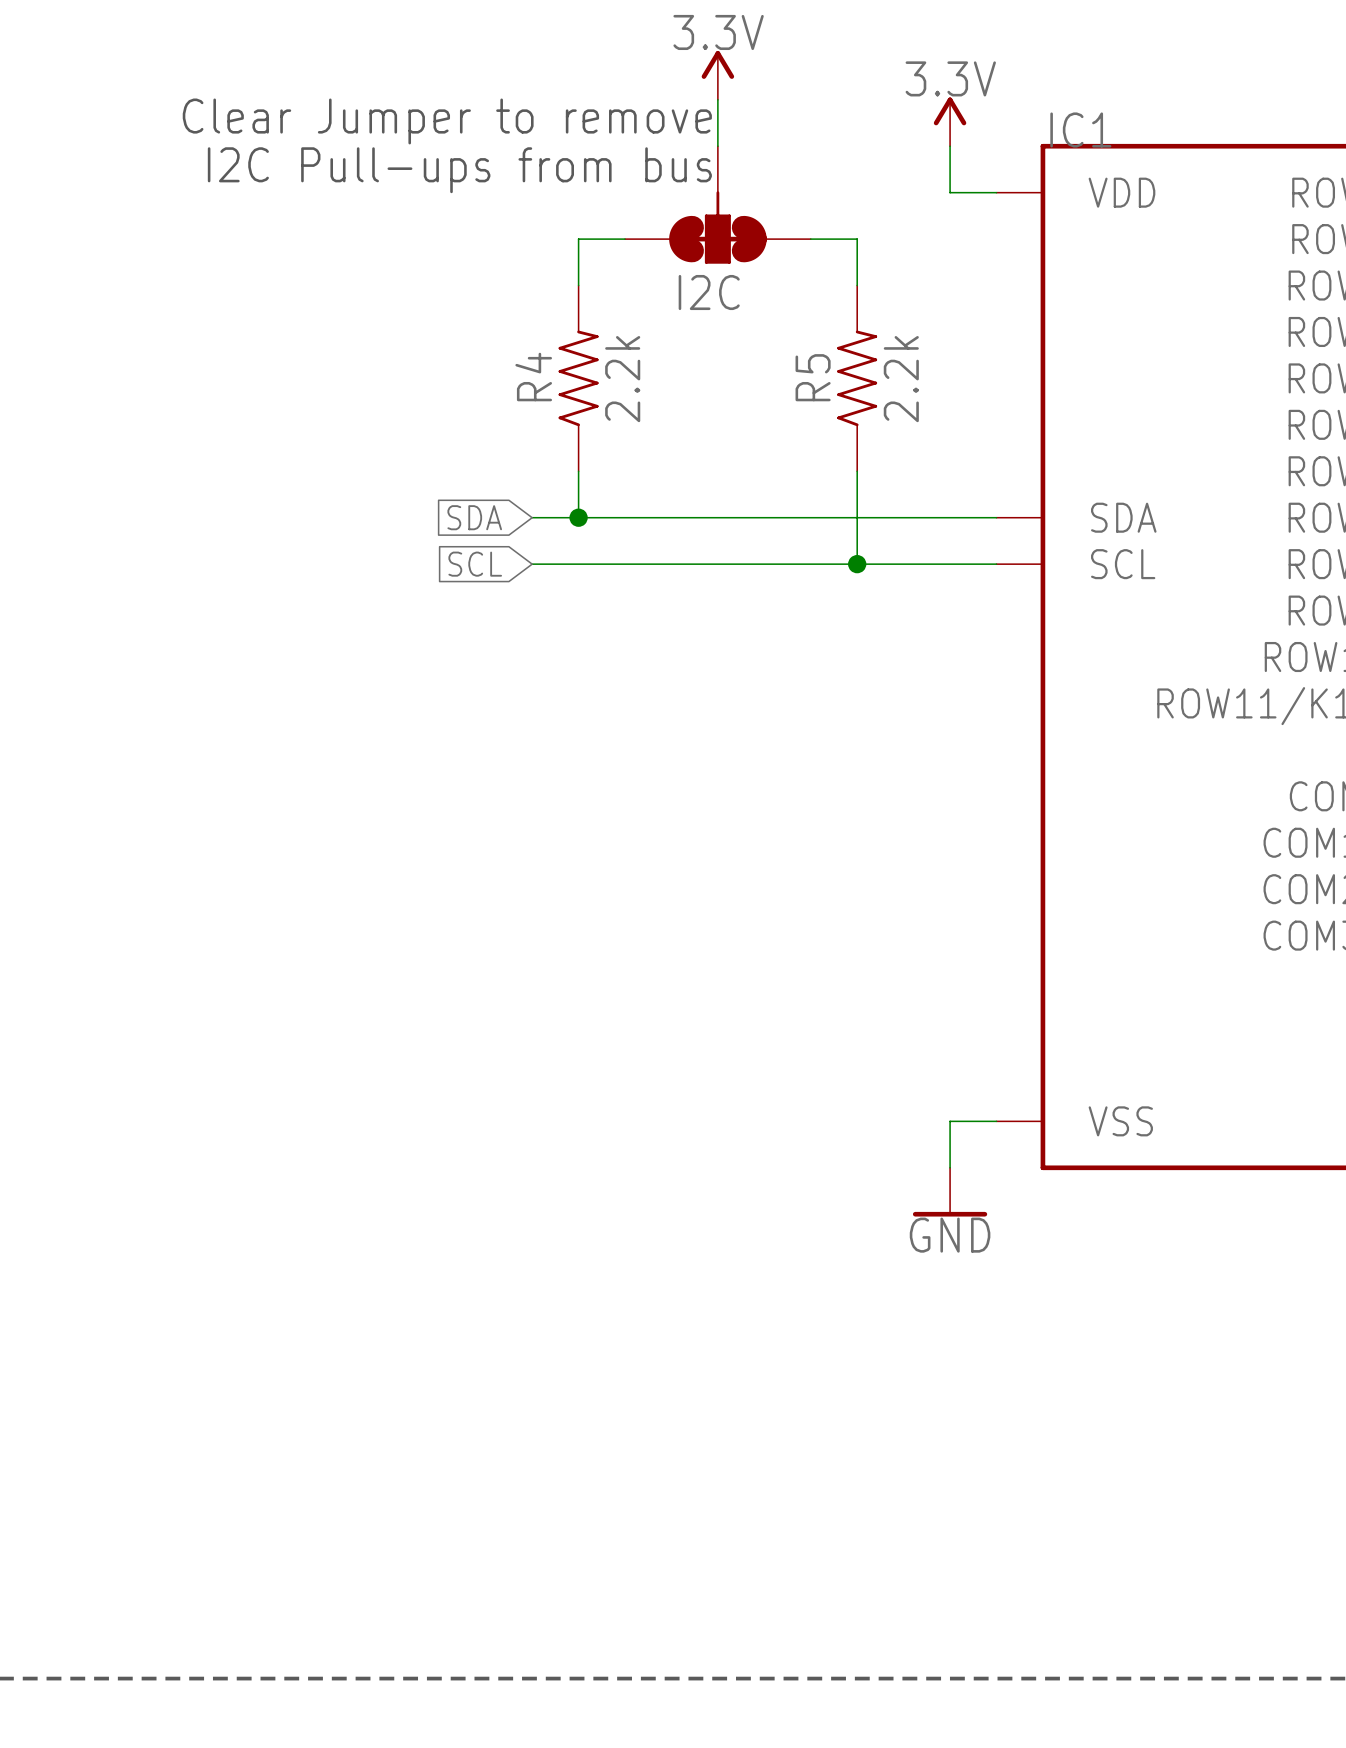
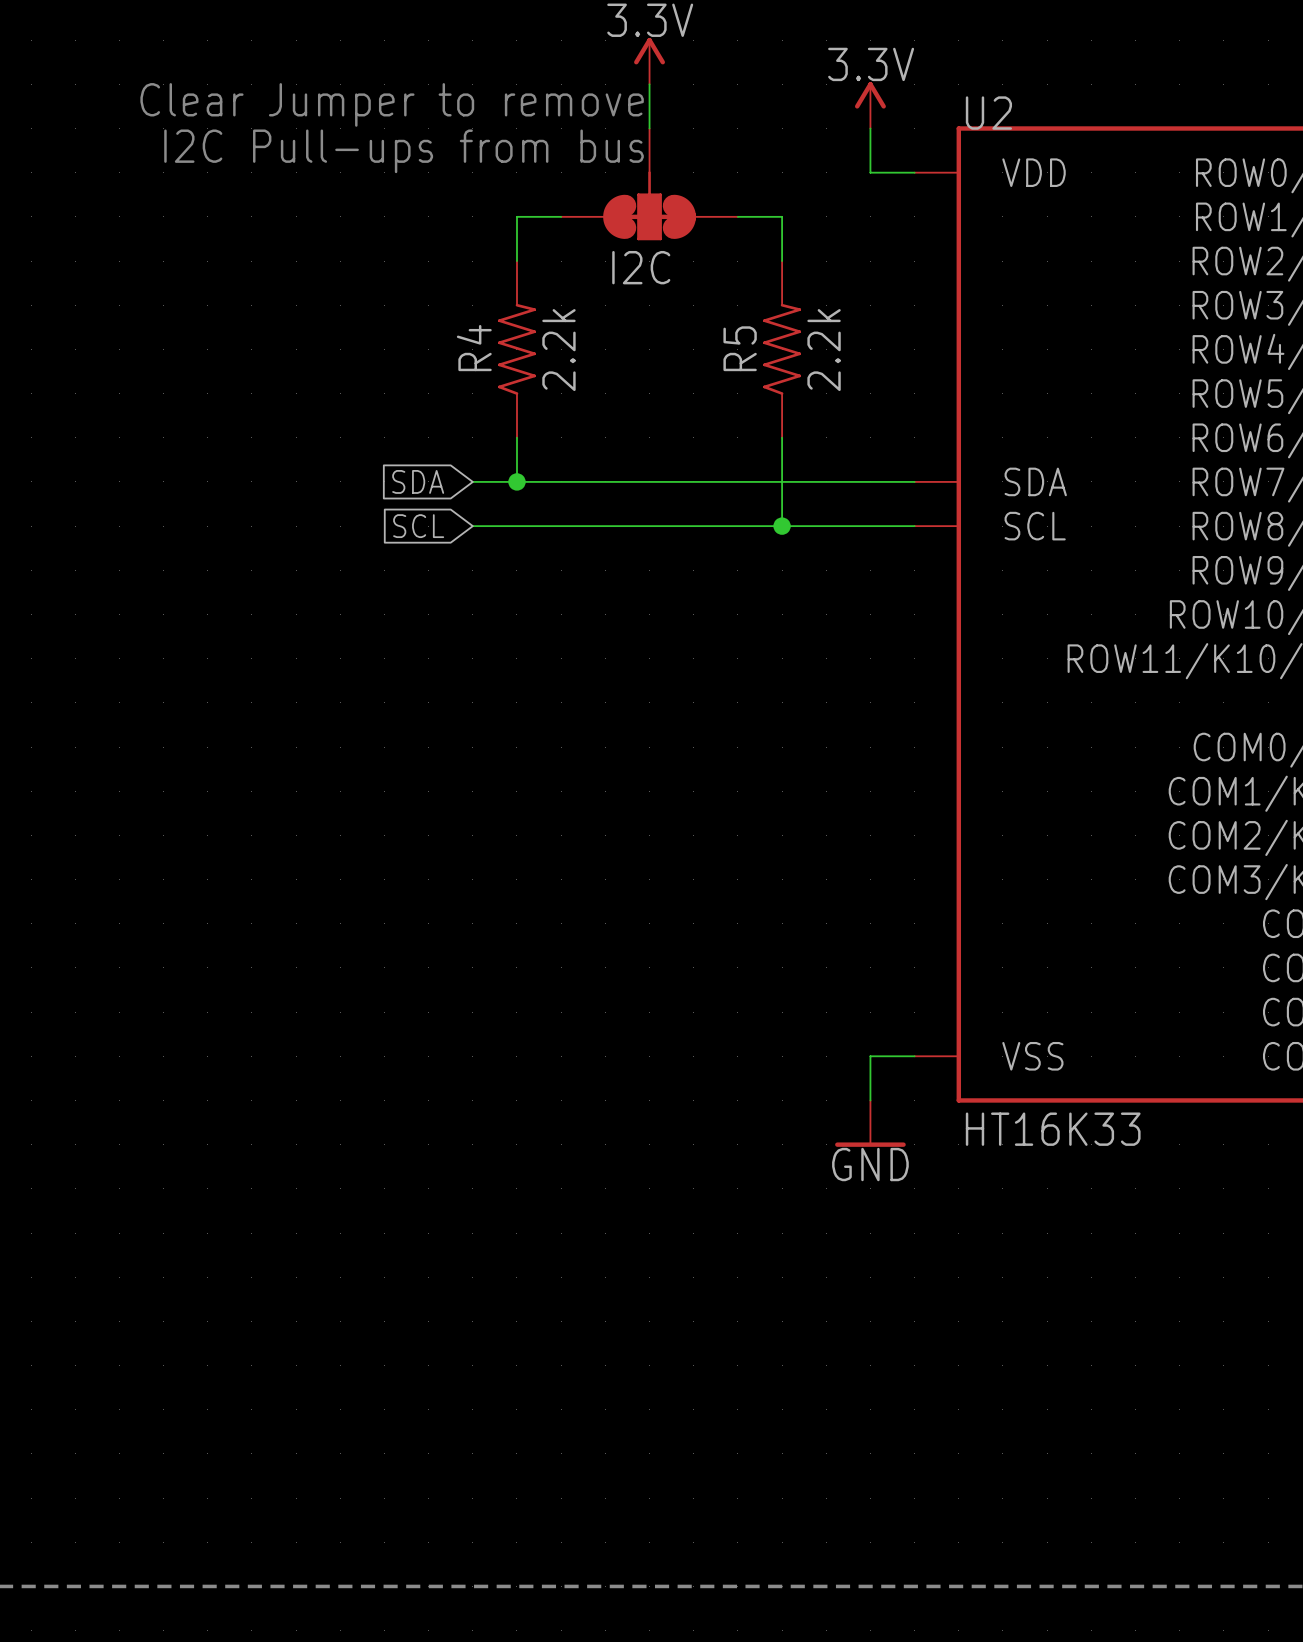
IC1 name: IC1 (1080, 129) -> U2 (988, 113)
IC1 value: none -> HT16K33 (1053, 1129)

